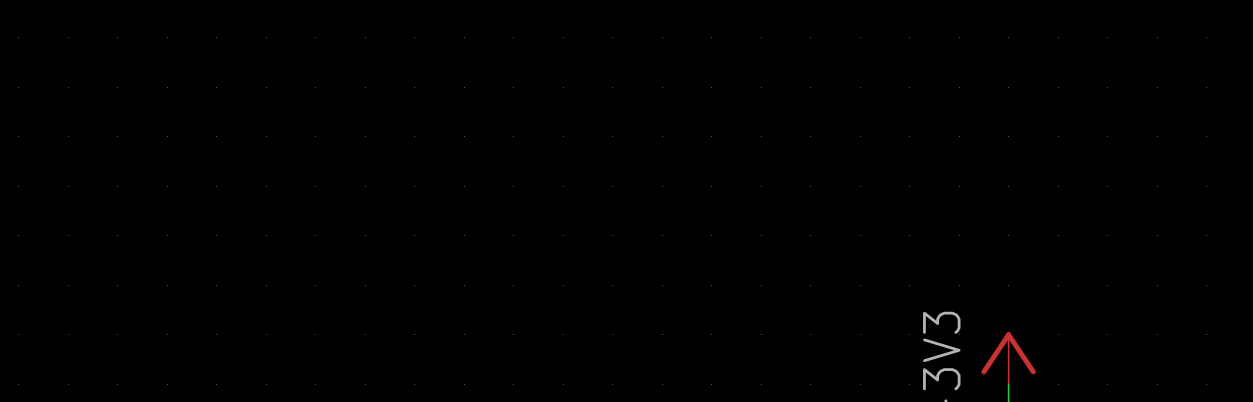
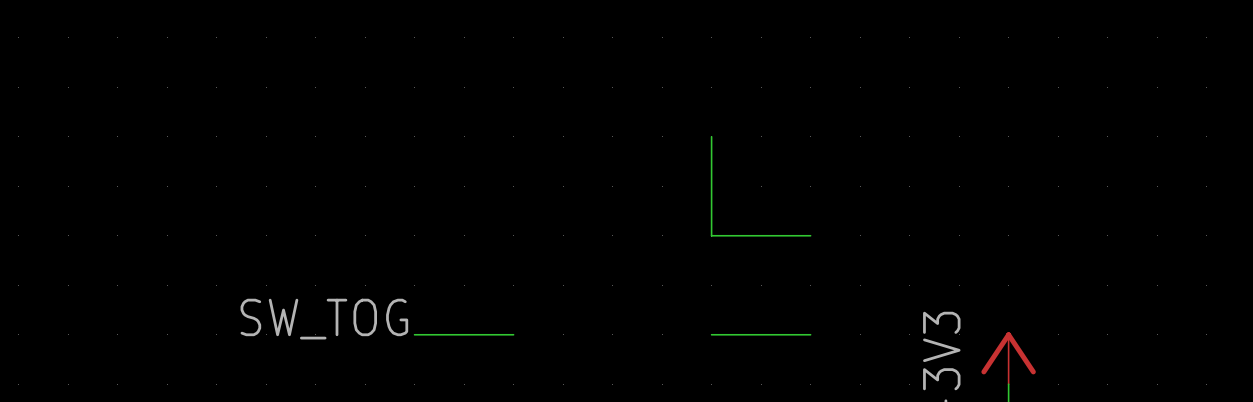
wire: none -> (711, 136) (711, 235) (810, 235)
label: none -> SW_TOG (324, 319)
wire: none -> (414, 334) (513, 334)
wire: none -> (711, 334) (810, 334)

